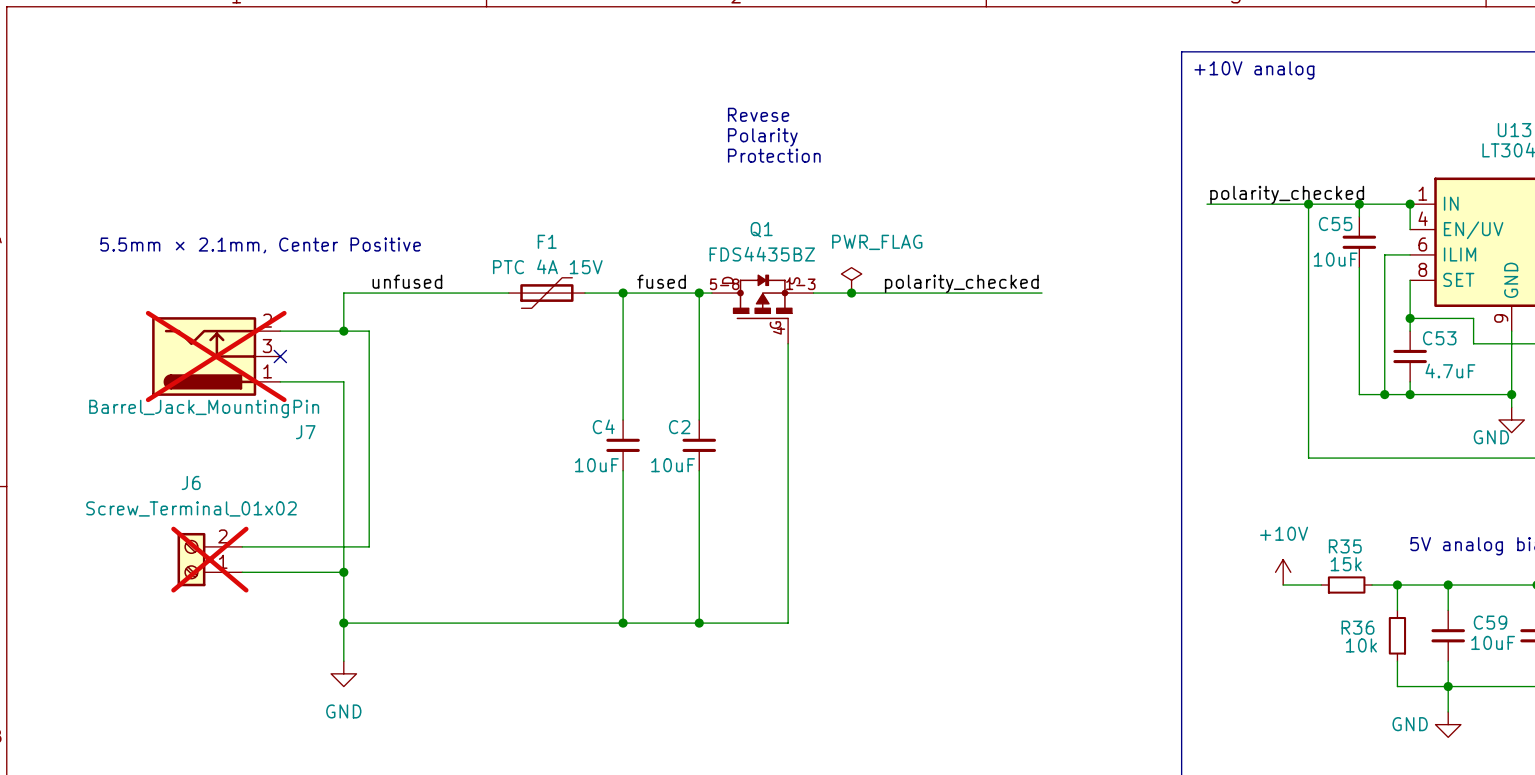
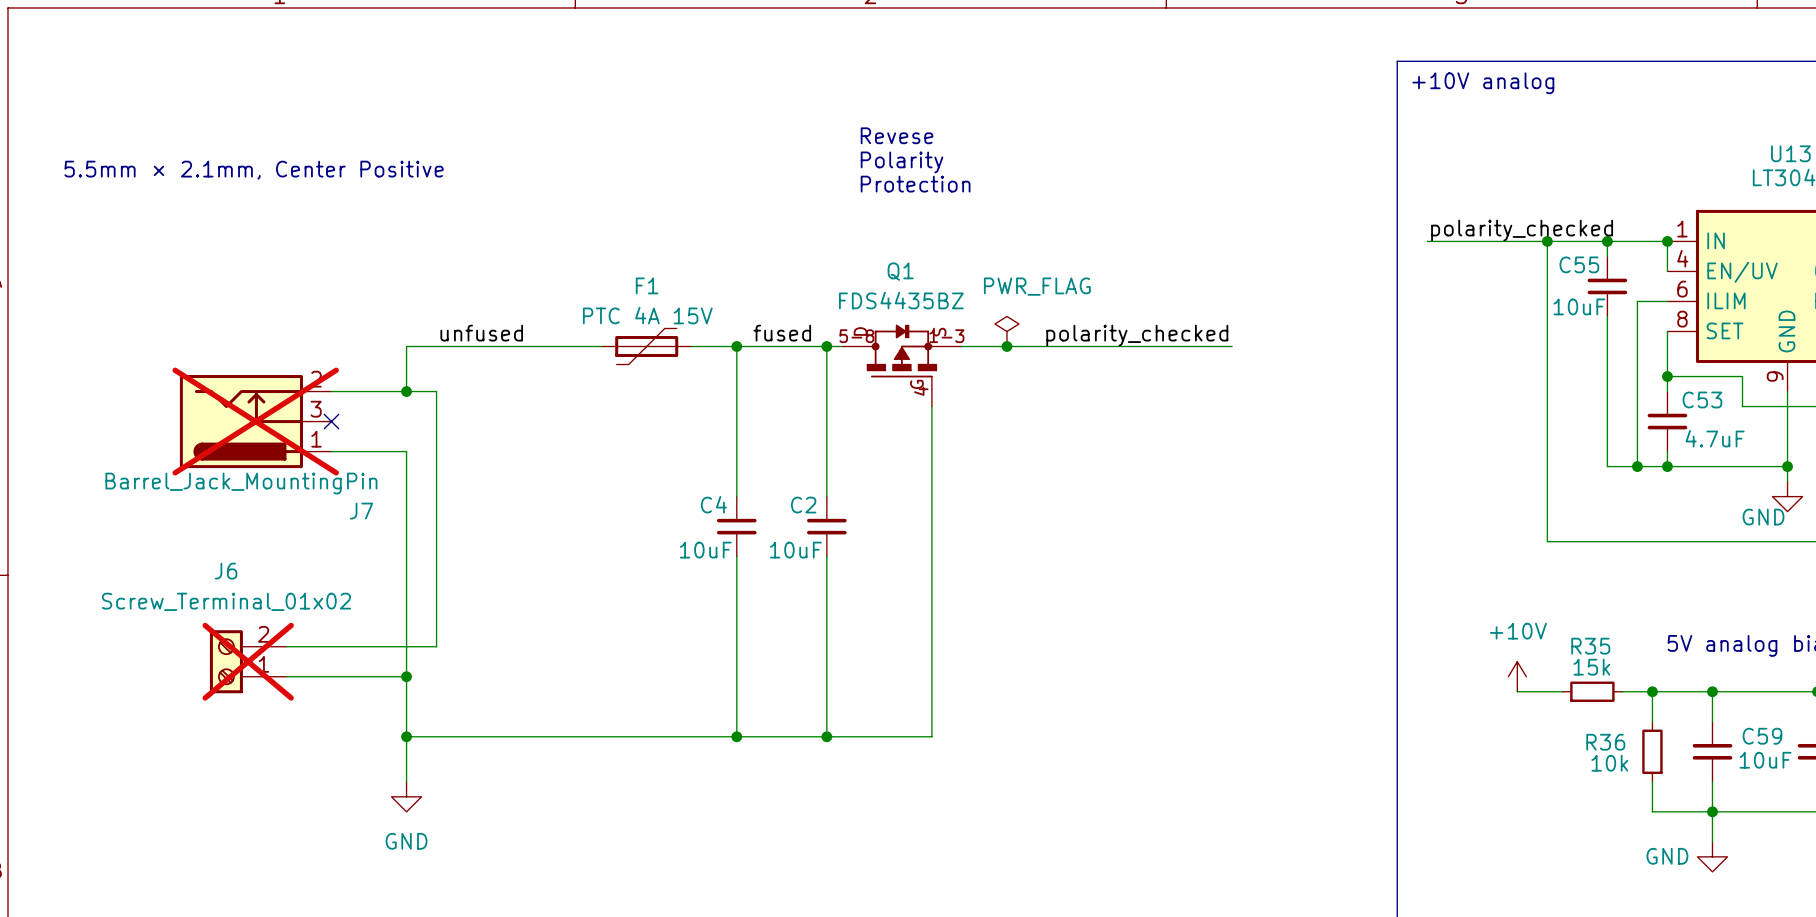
text position: 5.5mm × 2.1mm, Center Positive (260, 245) -> 5.5mm × 2.1mm, Center Positive (254, 170)

